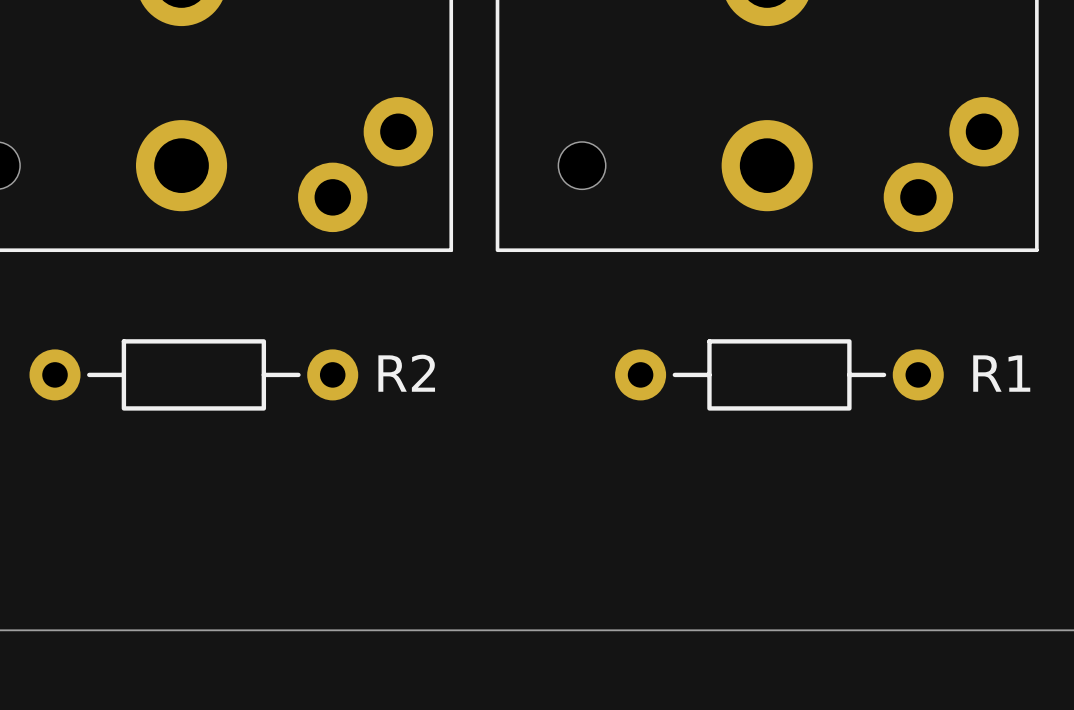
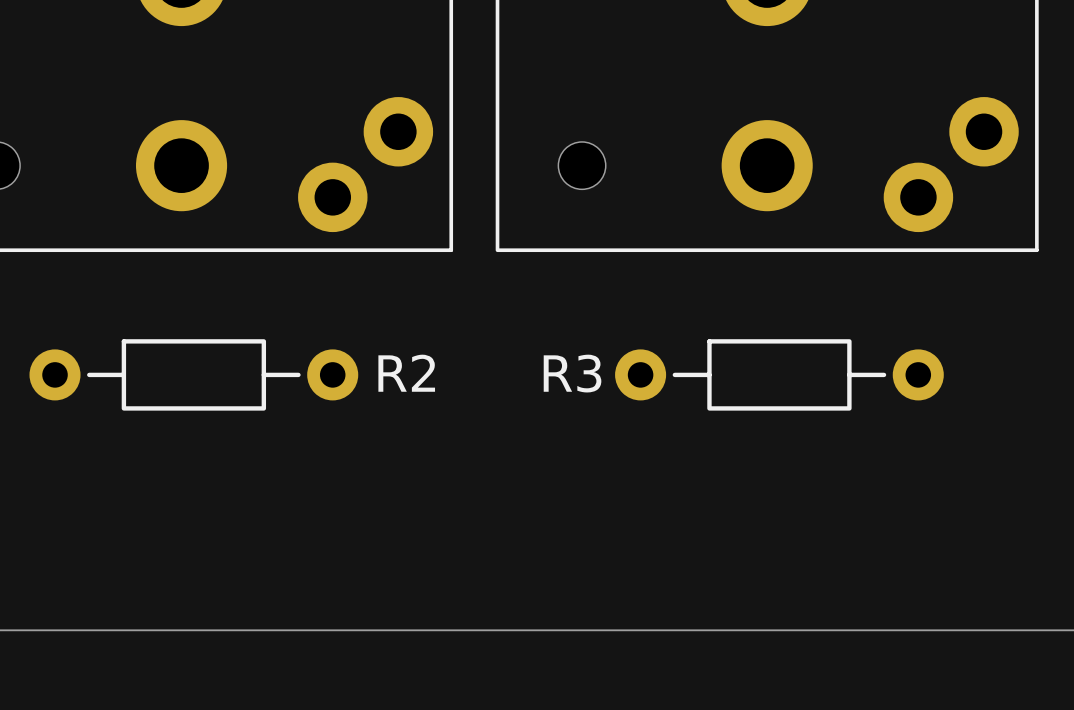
R1 name: R1 (1001, 373) -> R3 (572, 373)

